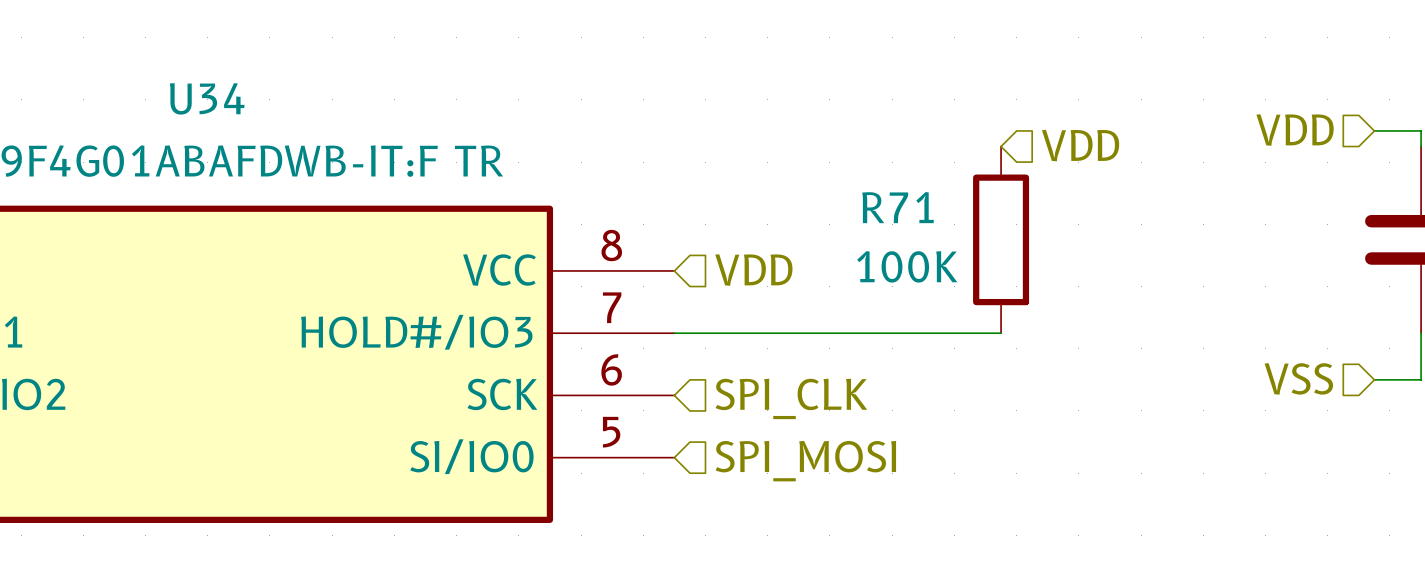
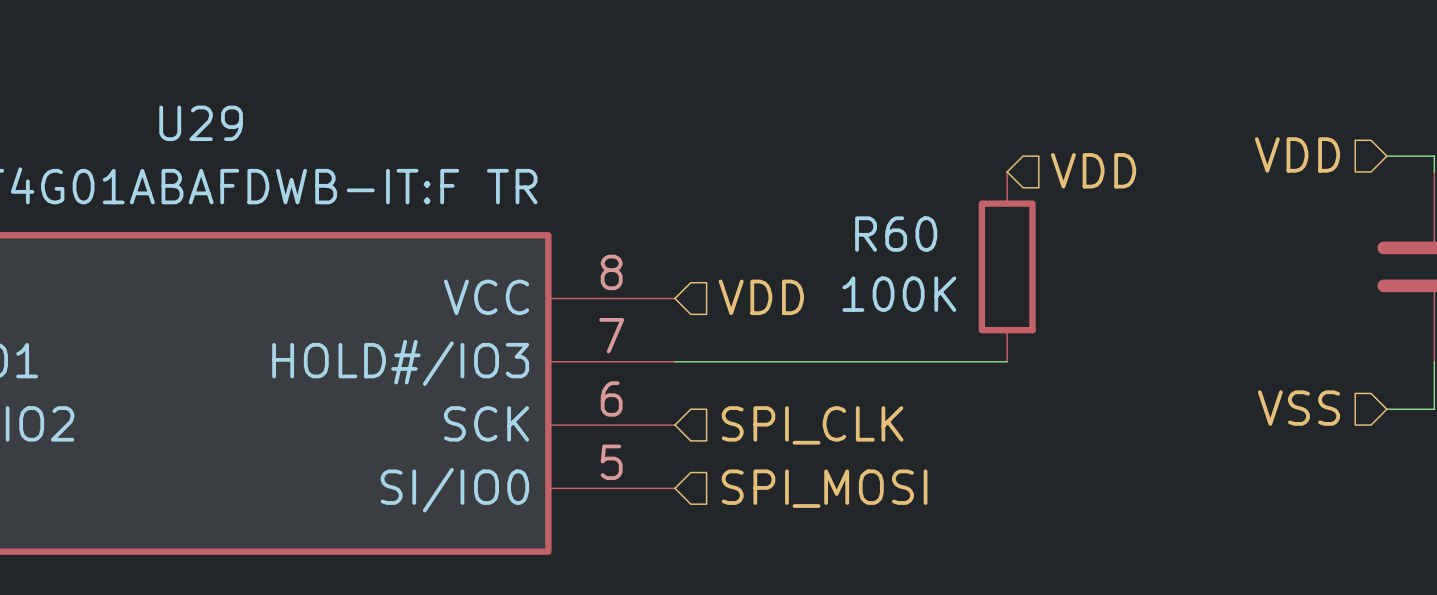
U34 name: U34 (207, 98) -> U29 (201, 123)
R71 name: R71 (897, 207) -> R60 (896, 234)

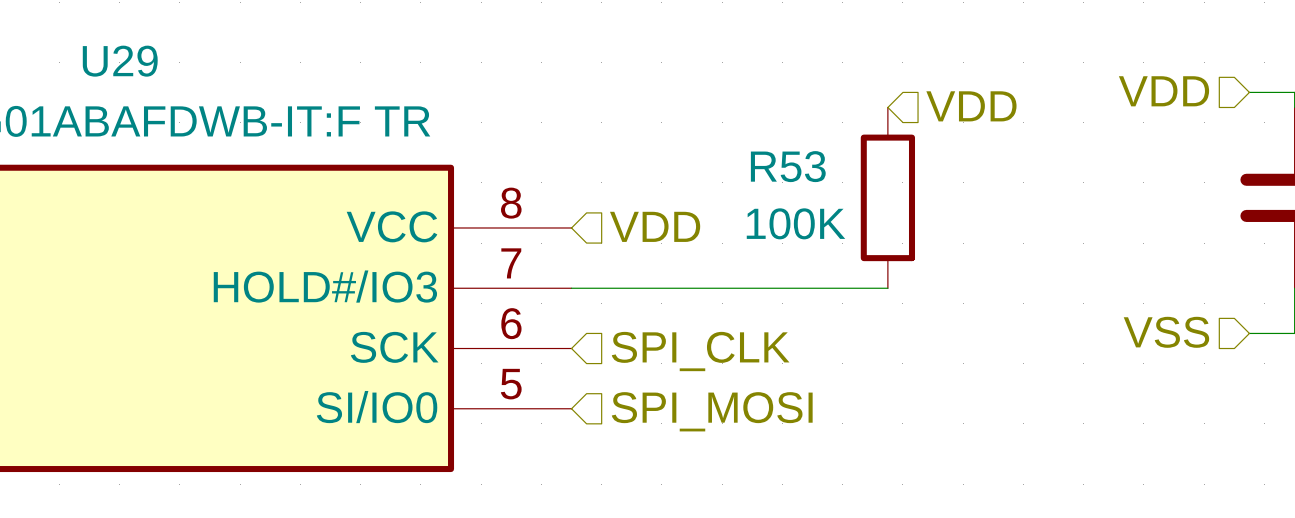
R60 name: R60 (896, 234) -> R53 (788, 166)

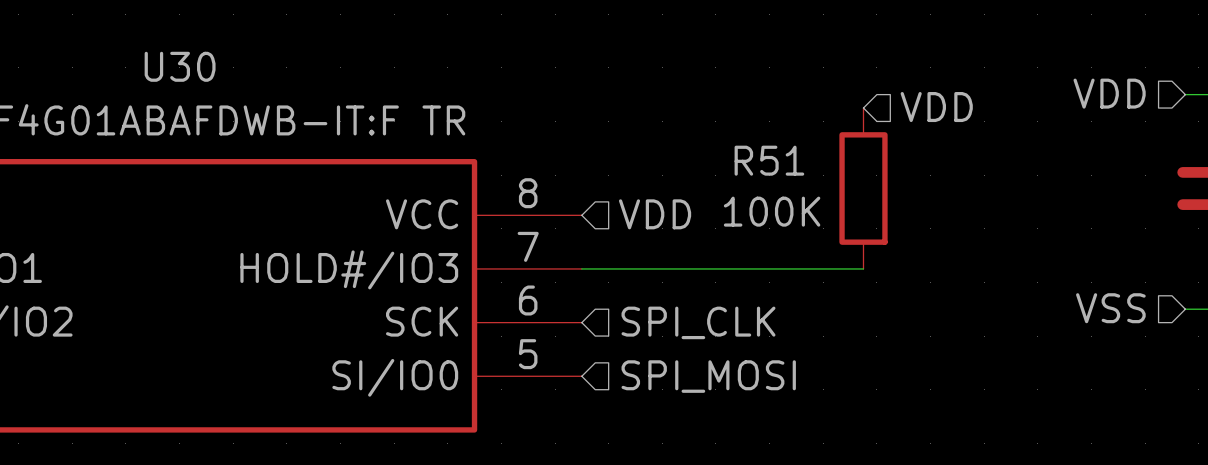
U29 name: U29 (120, 61) -> U30 (180, 66)
R53 name: R53 (788, 166) -> R51 (769, 160)

